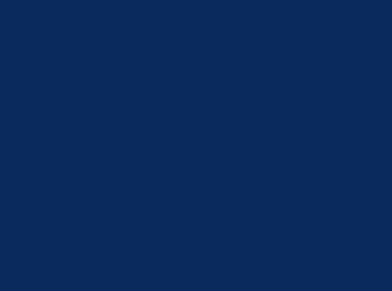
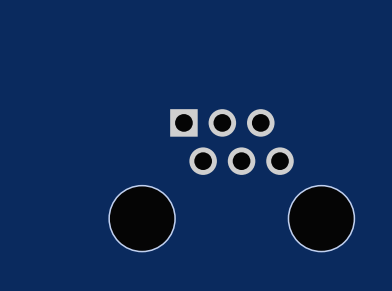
part: none -> (231, 180)

